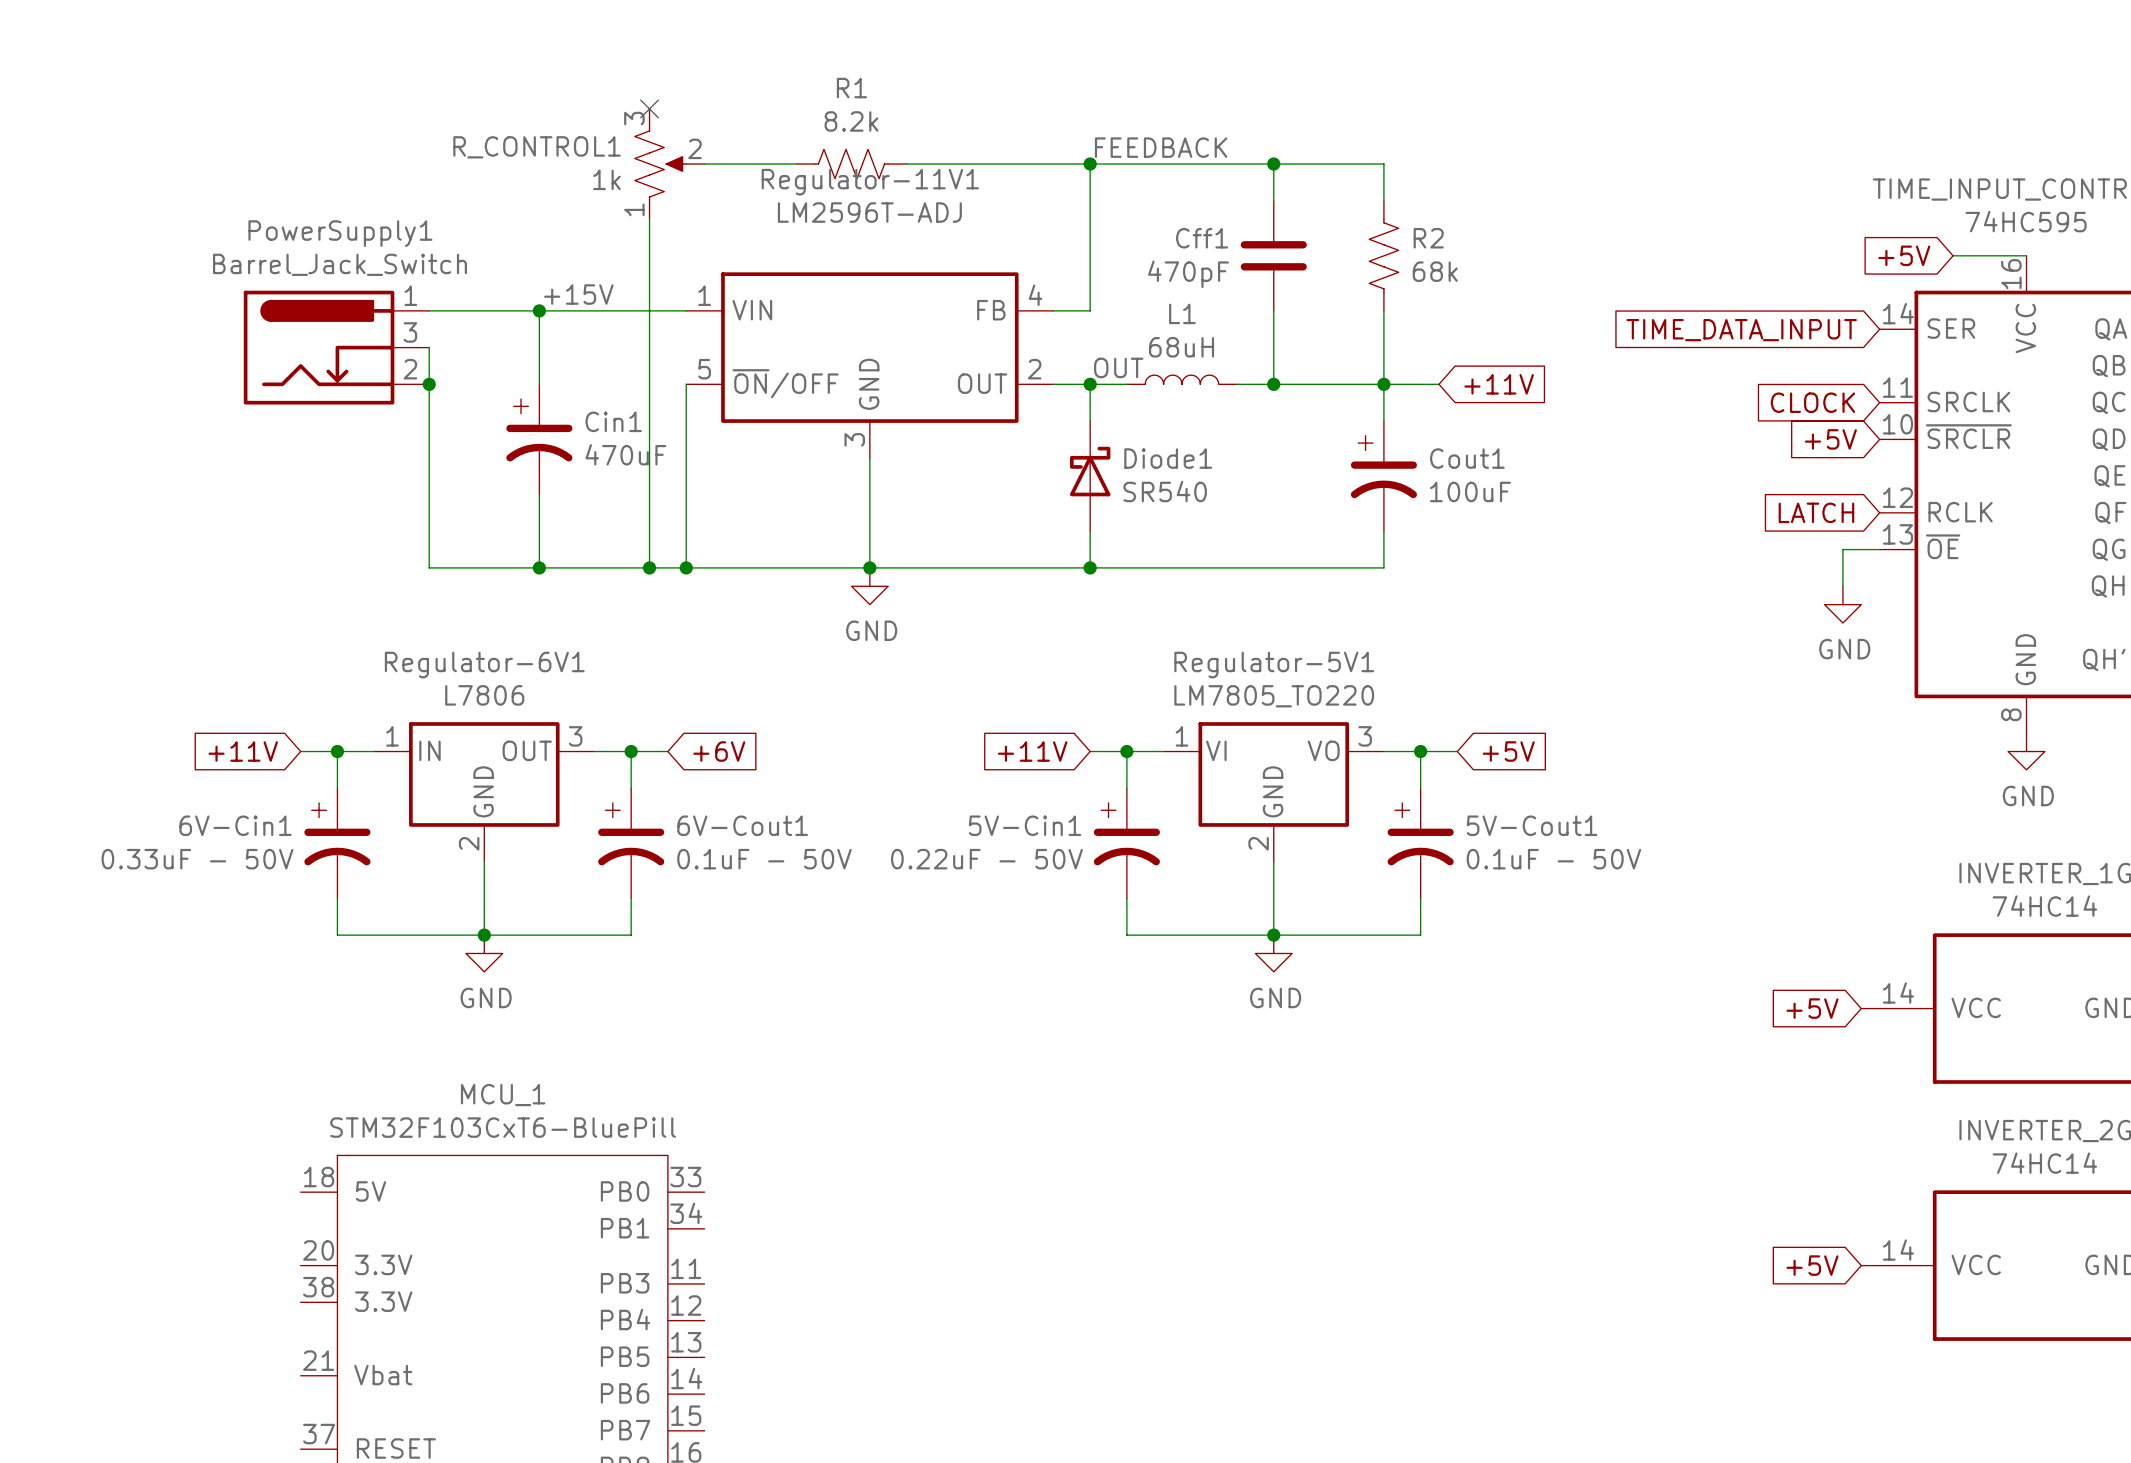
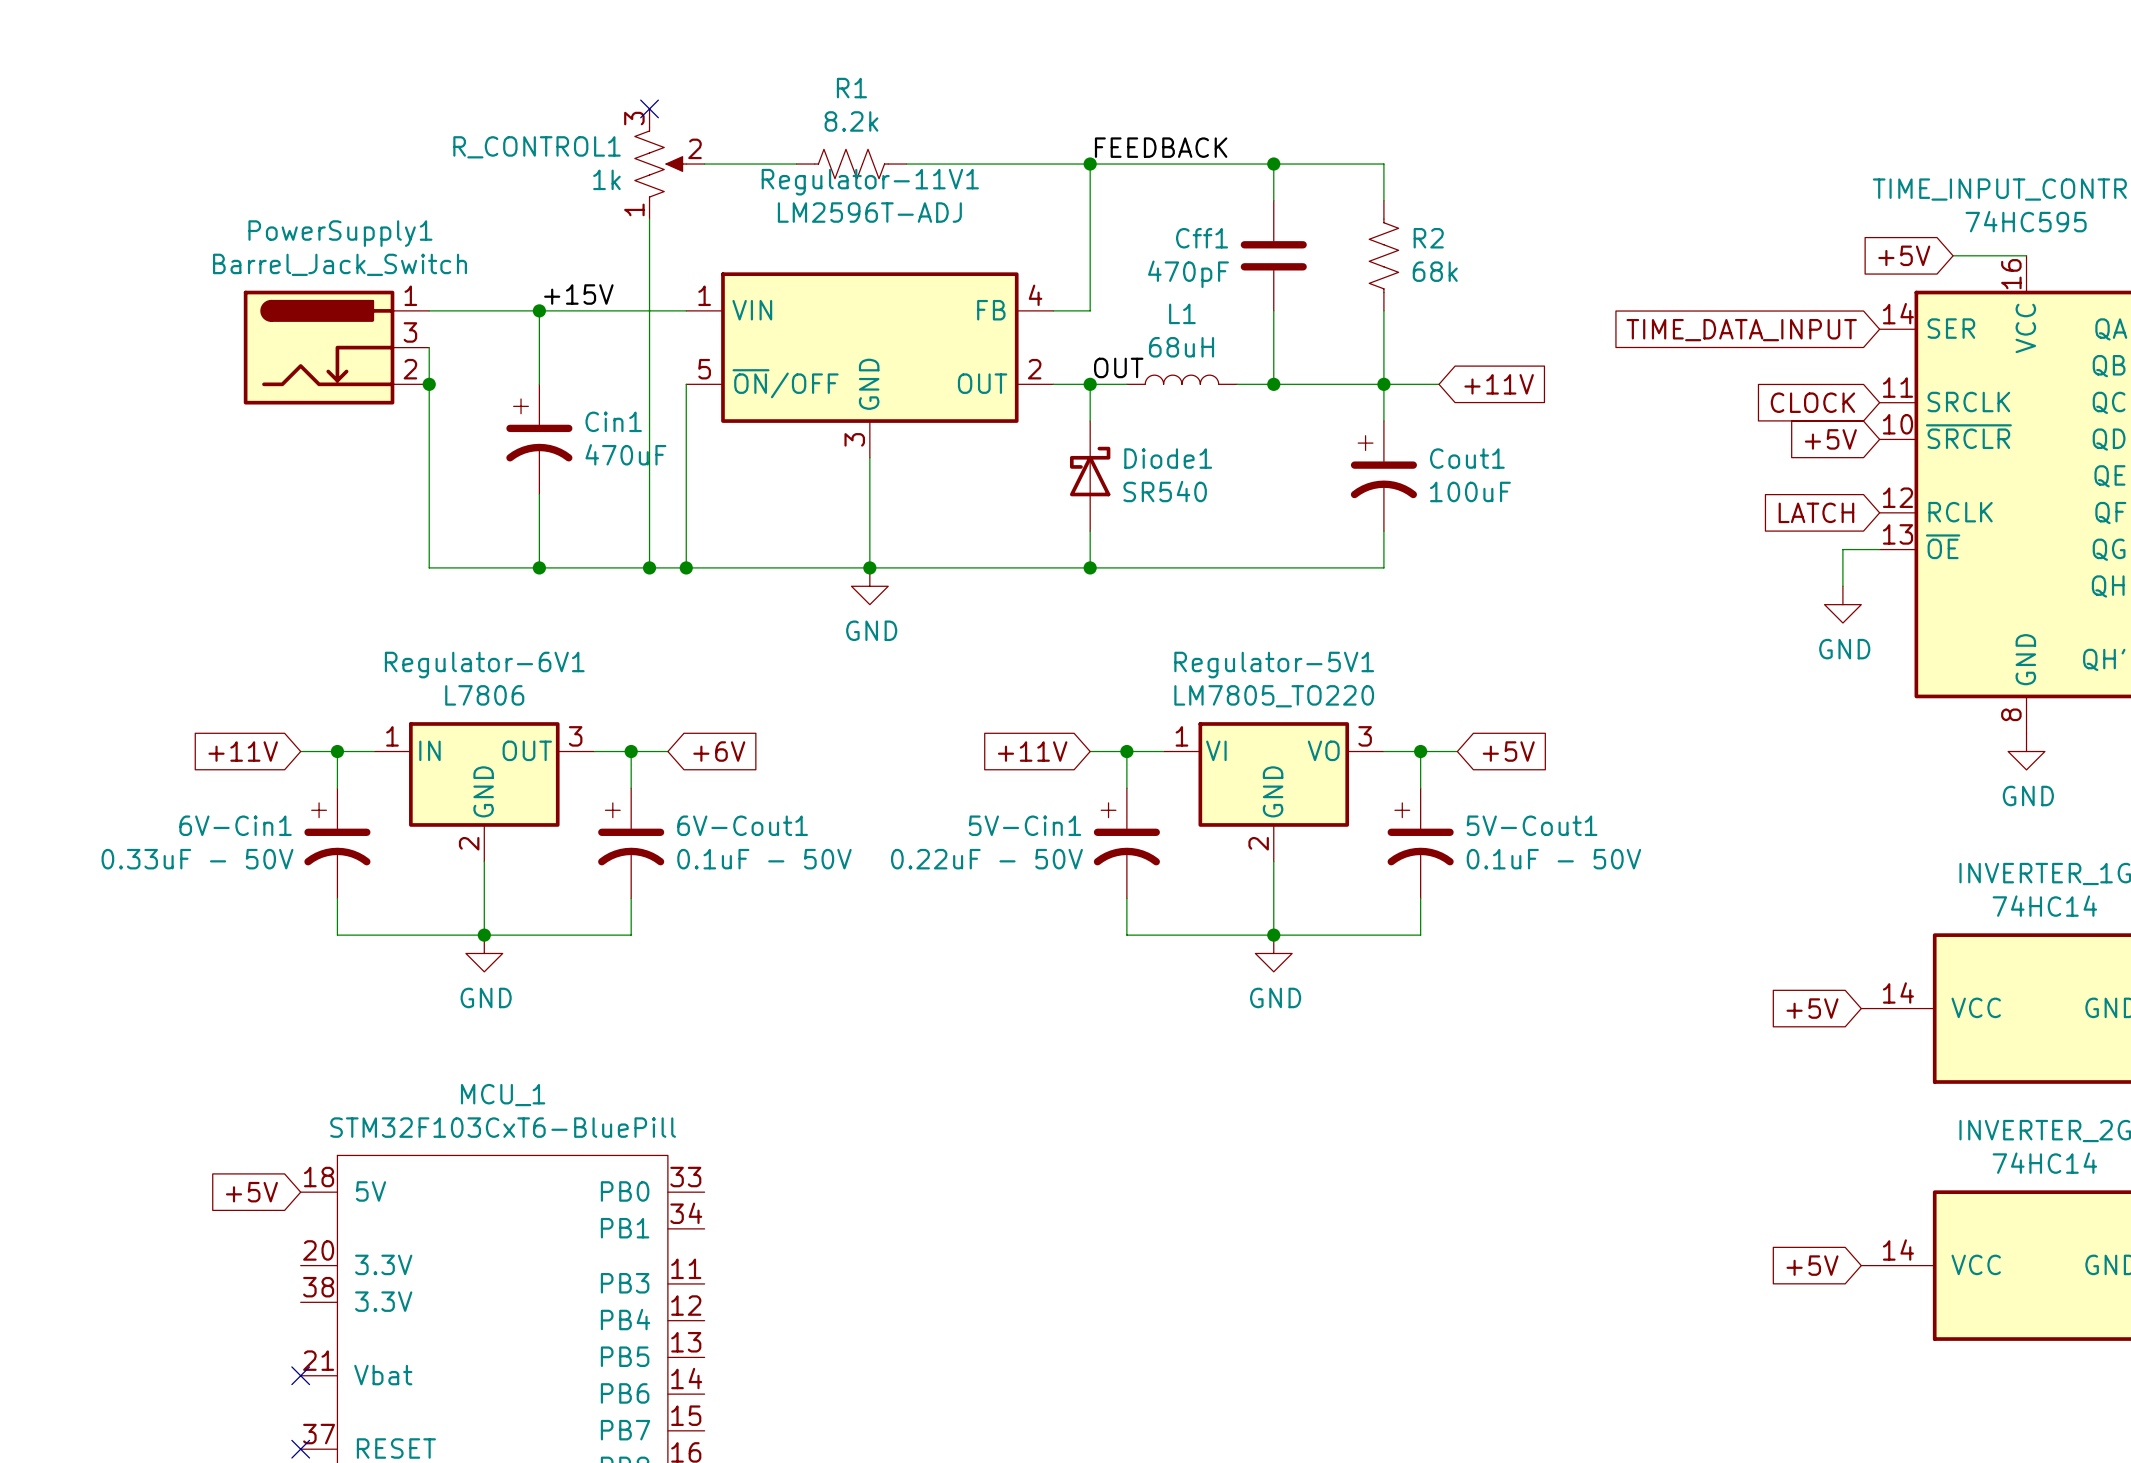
global label: none -> +5V (251, 1192)
no-connect mark: none -> (300, 1375)
no-connect mark: none -> (300, 1449)

